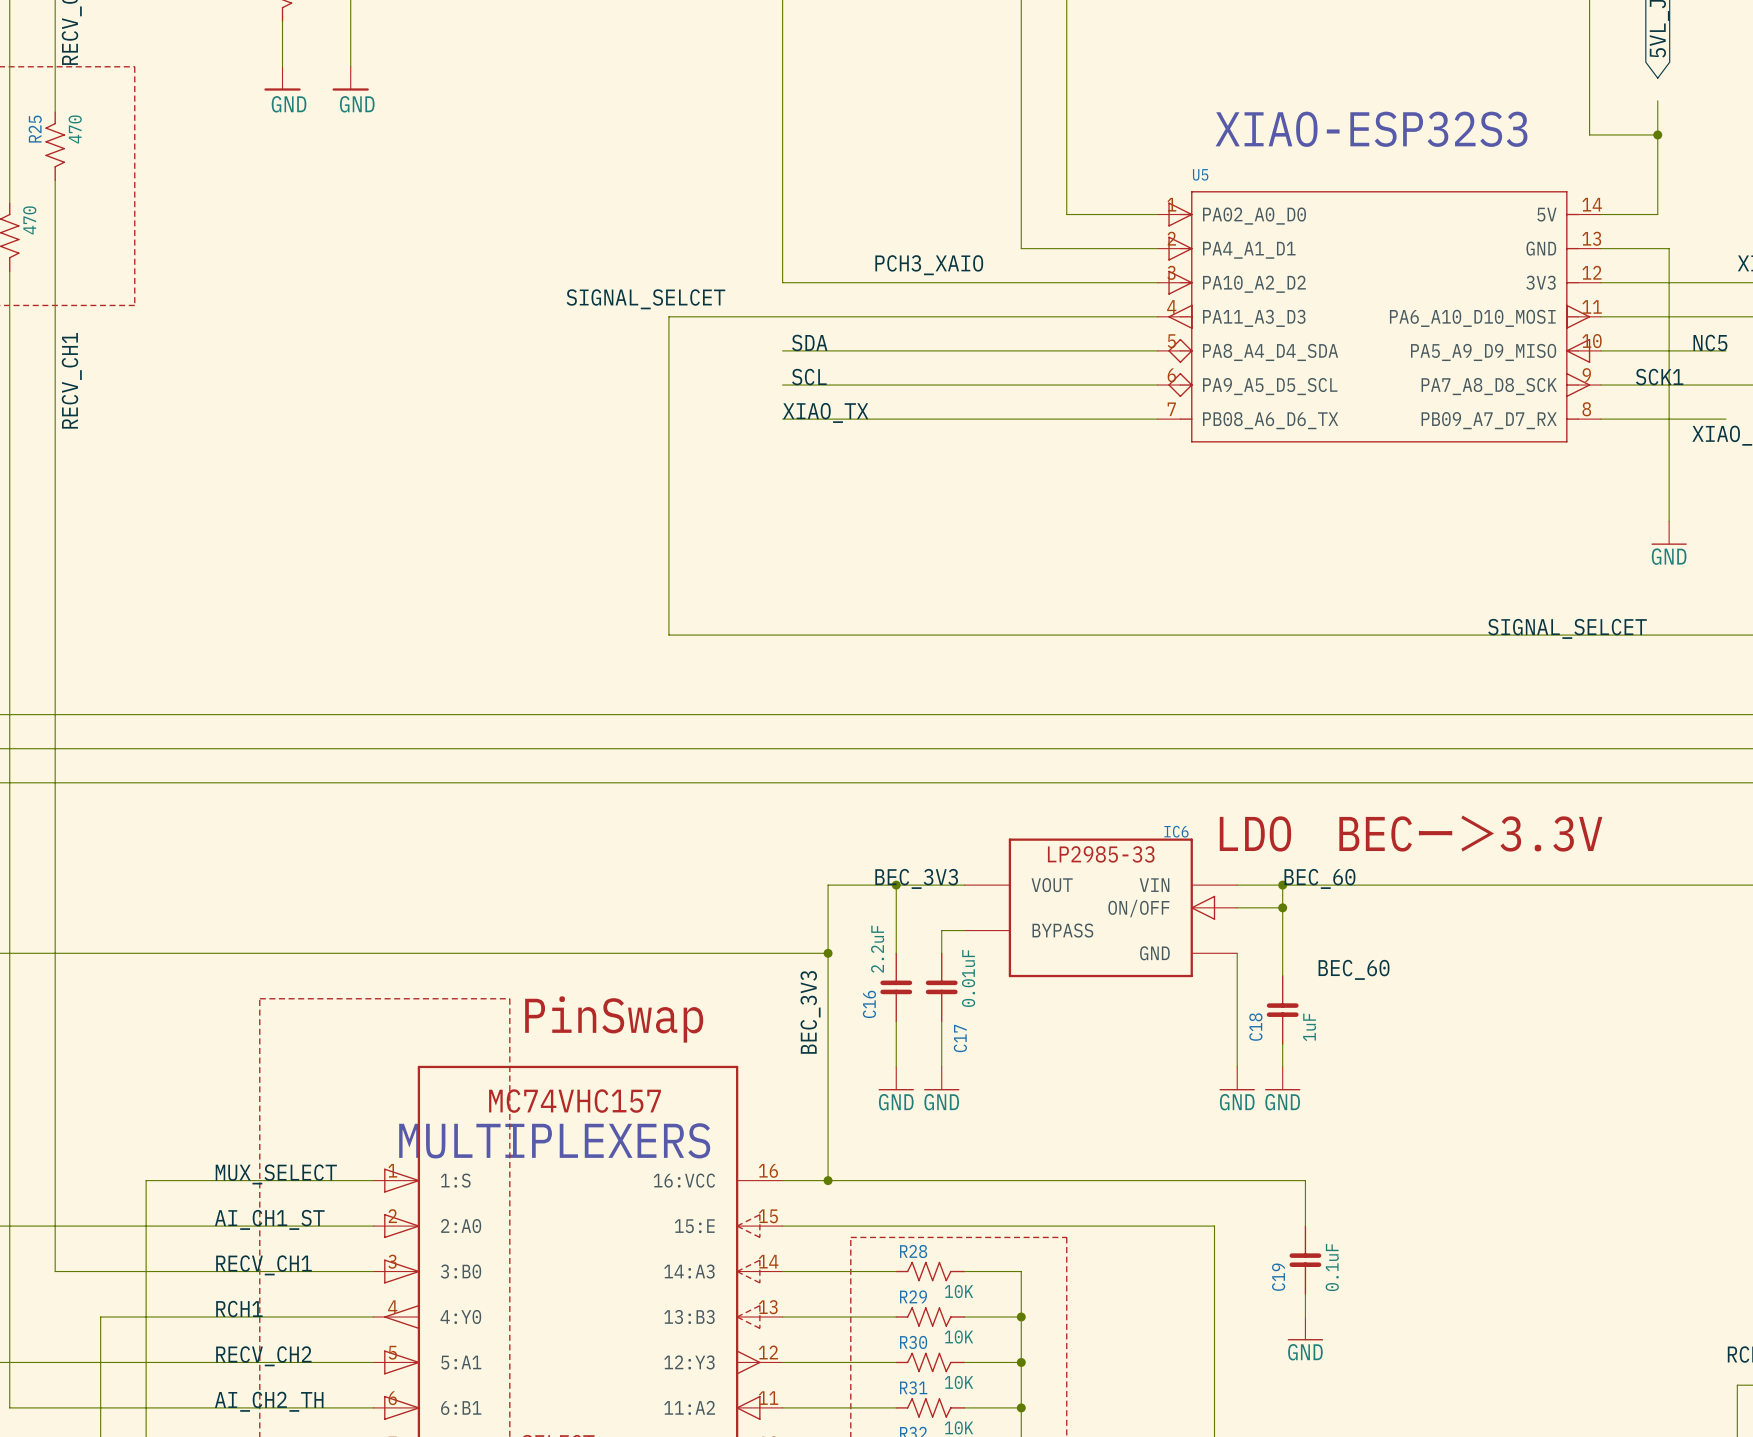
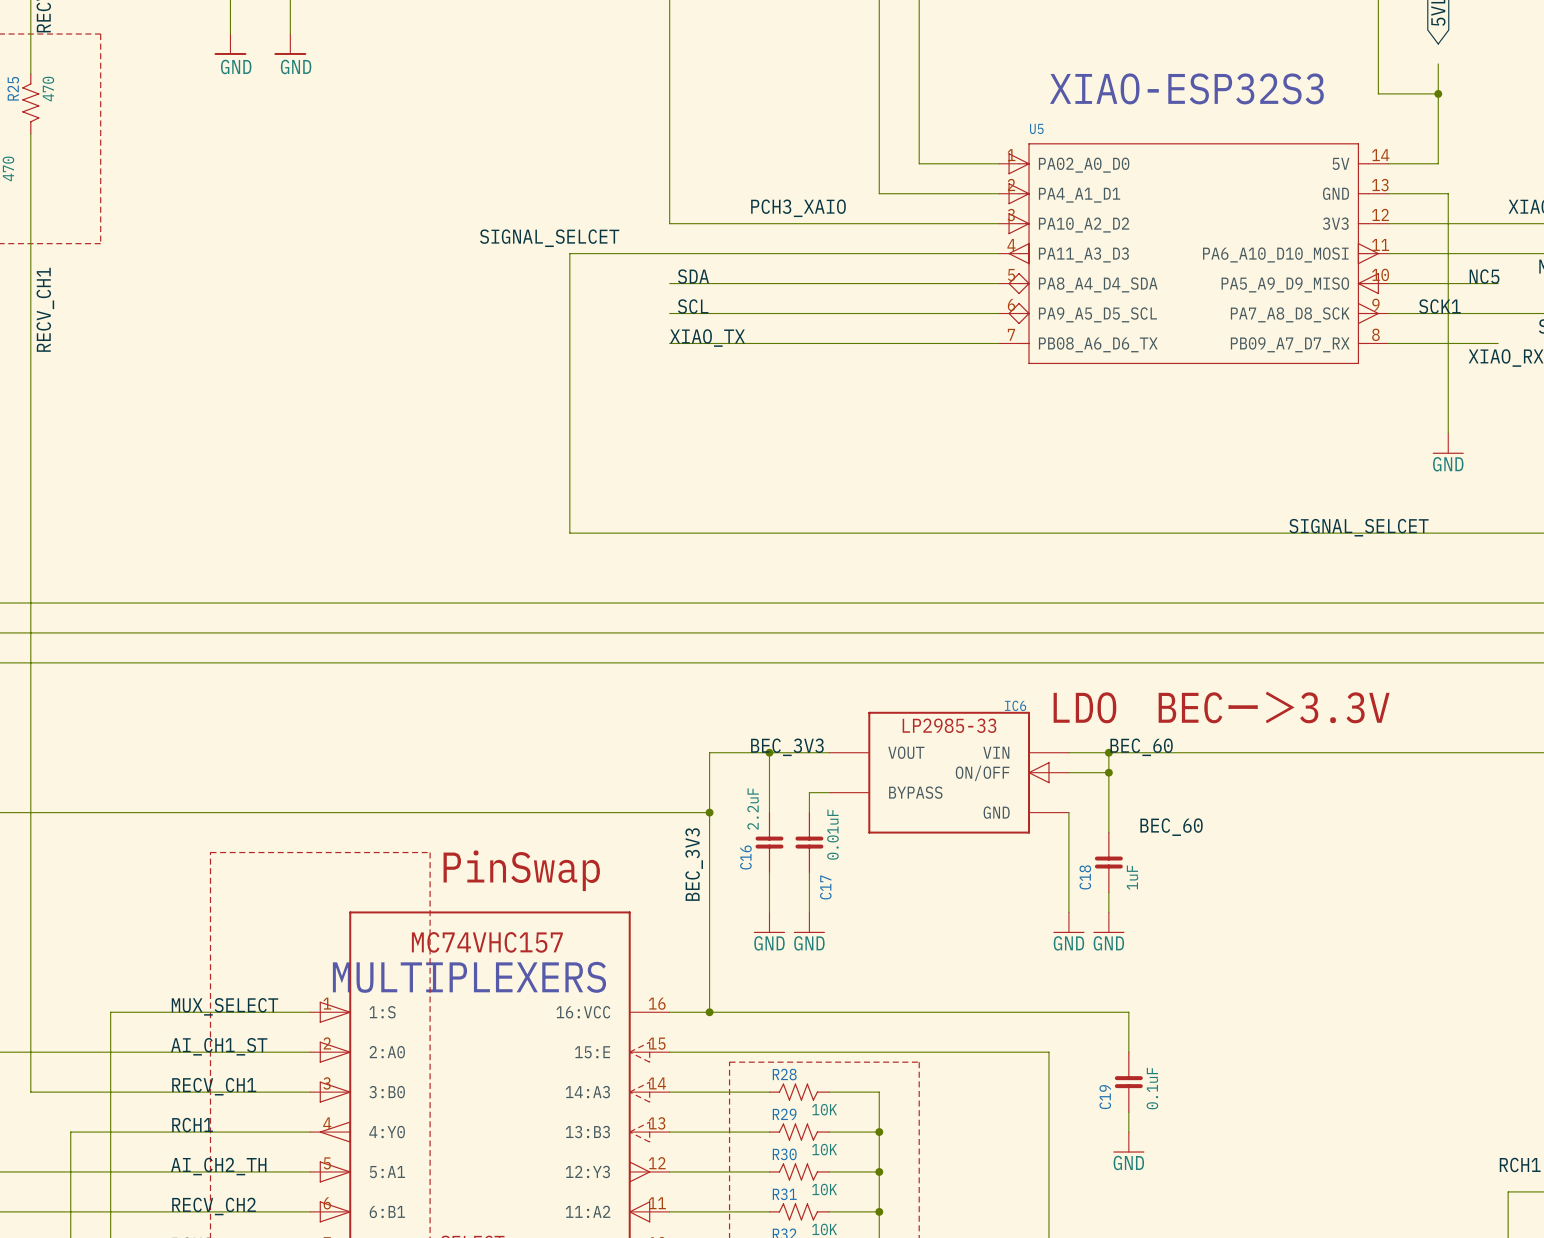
label: RECV_CH2 (263, 1356) -> AI_CH2_TH (218, 1166)
label: AI_CH2_TH (269, 1401) -> RECV_CH2 (214, 1206)

